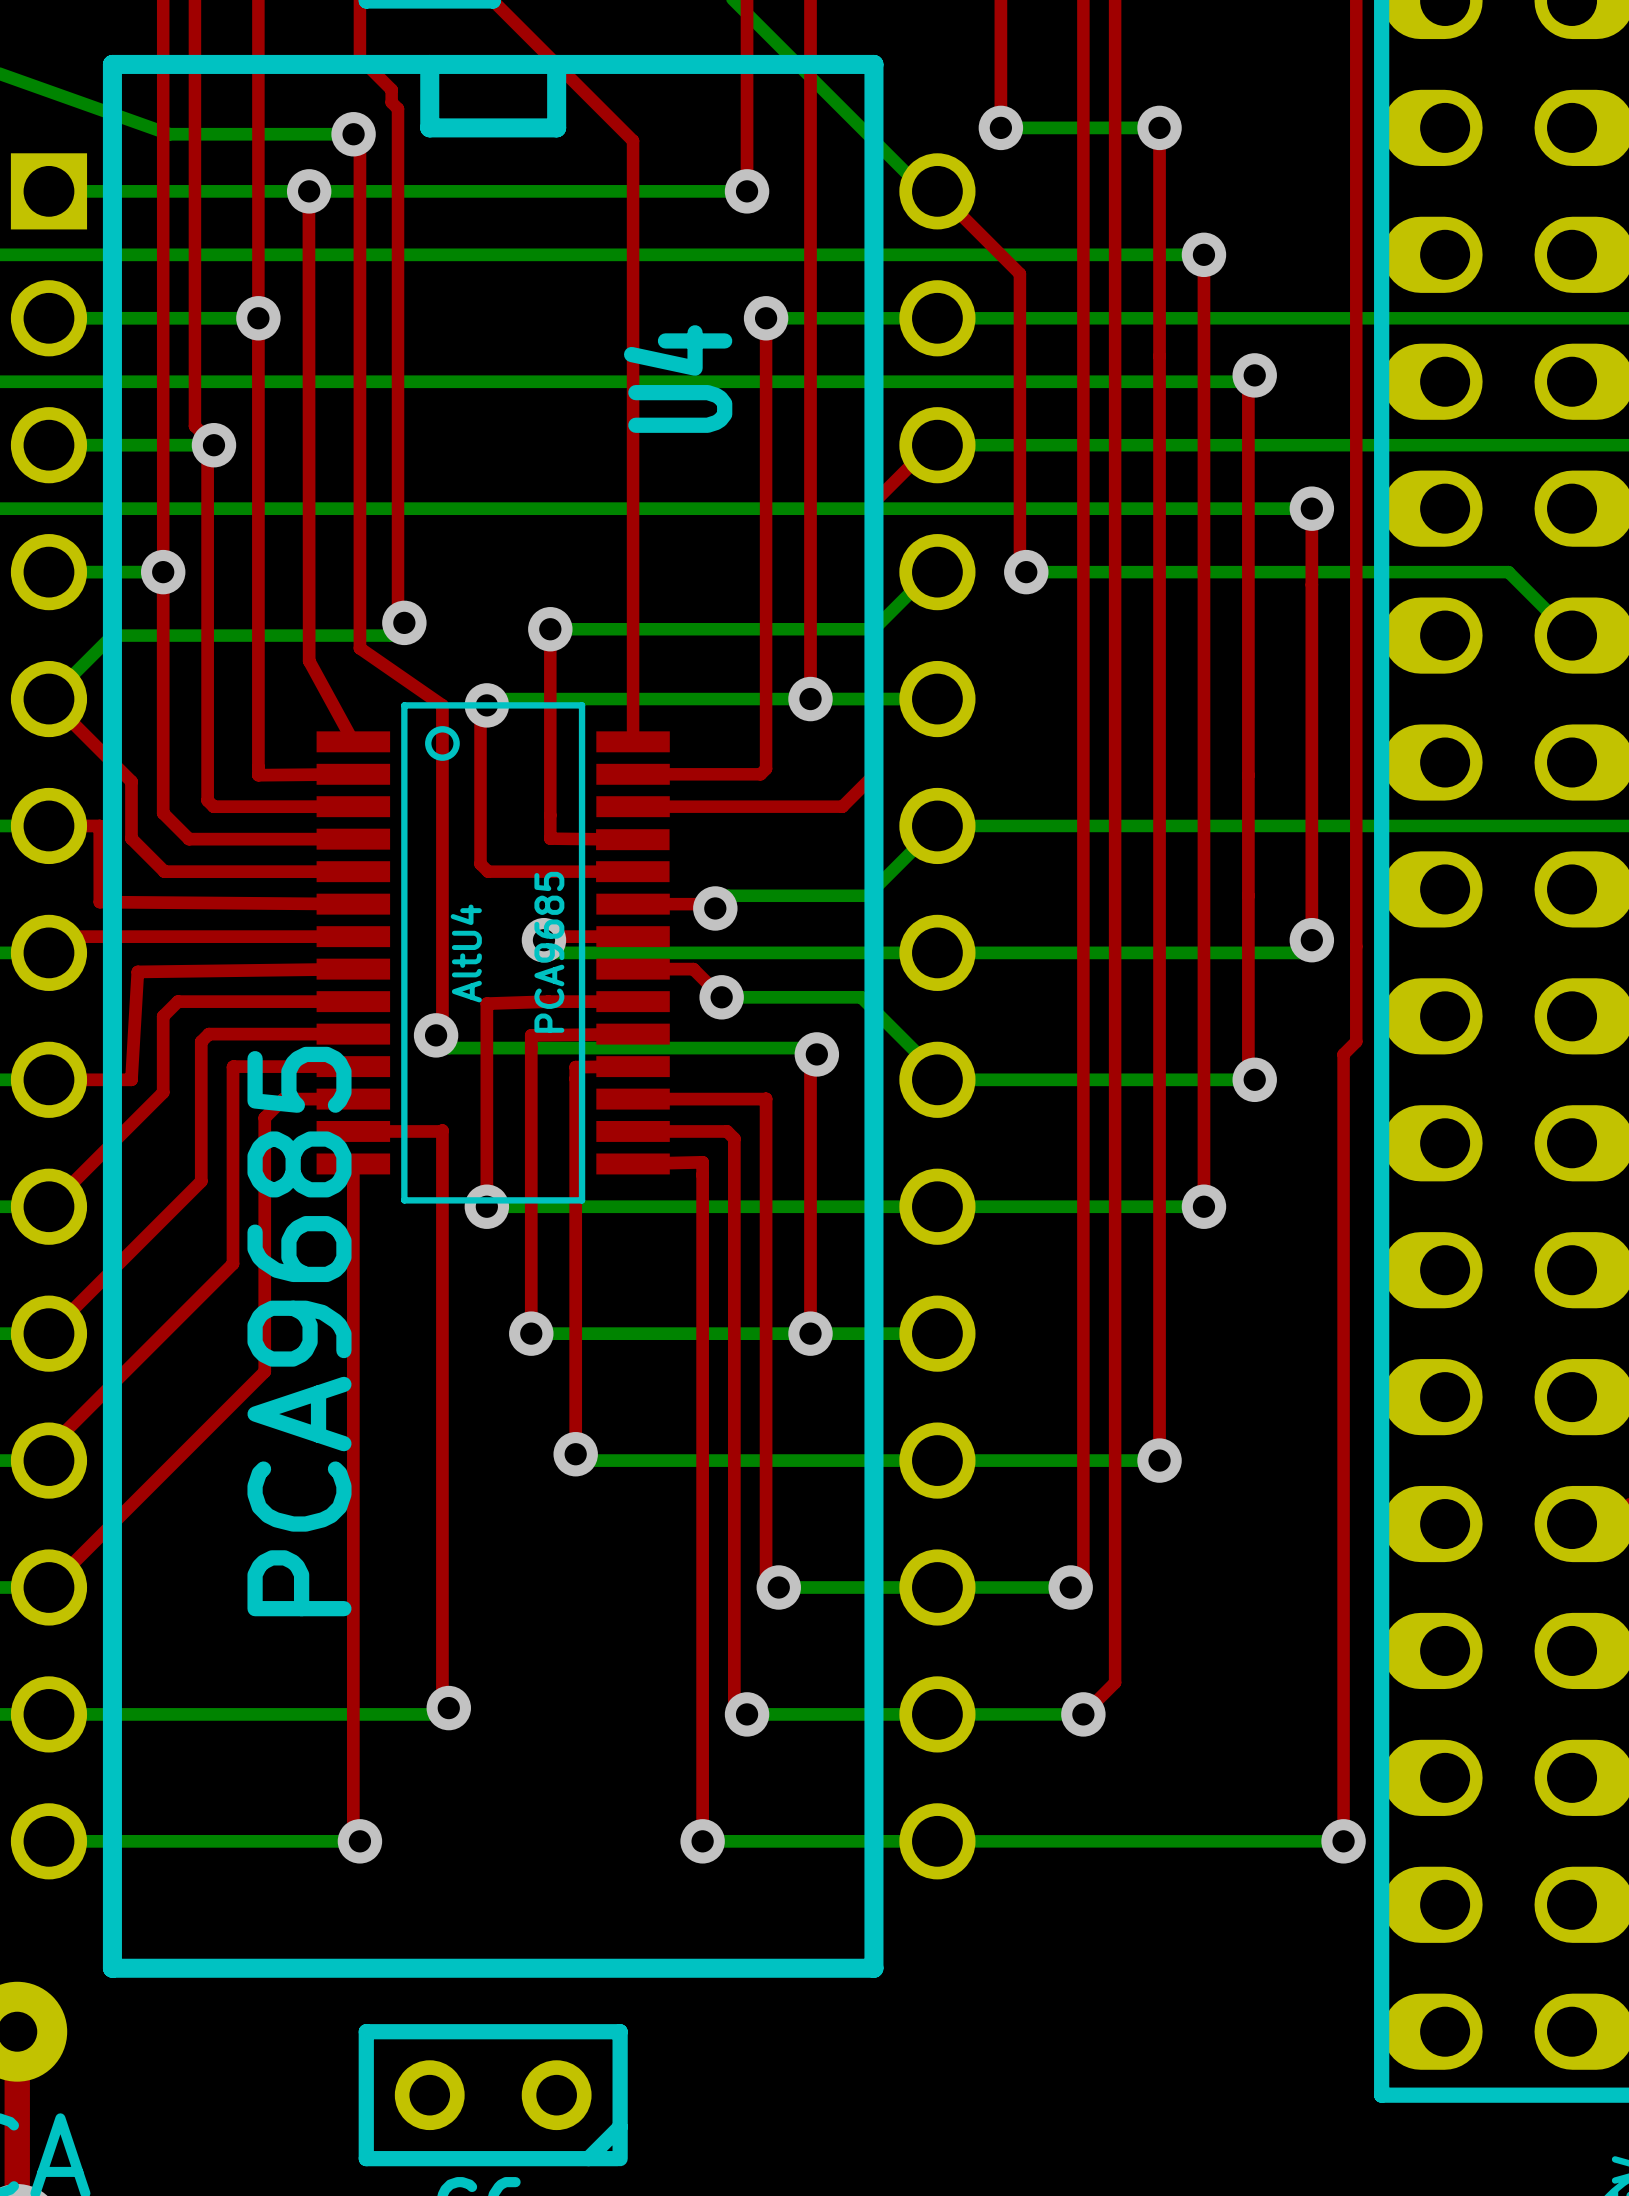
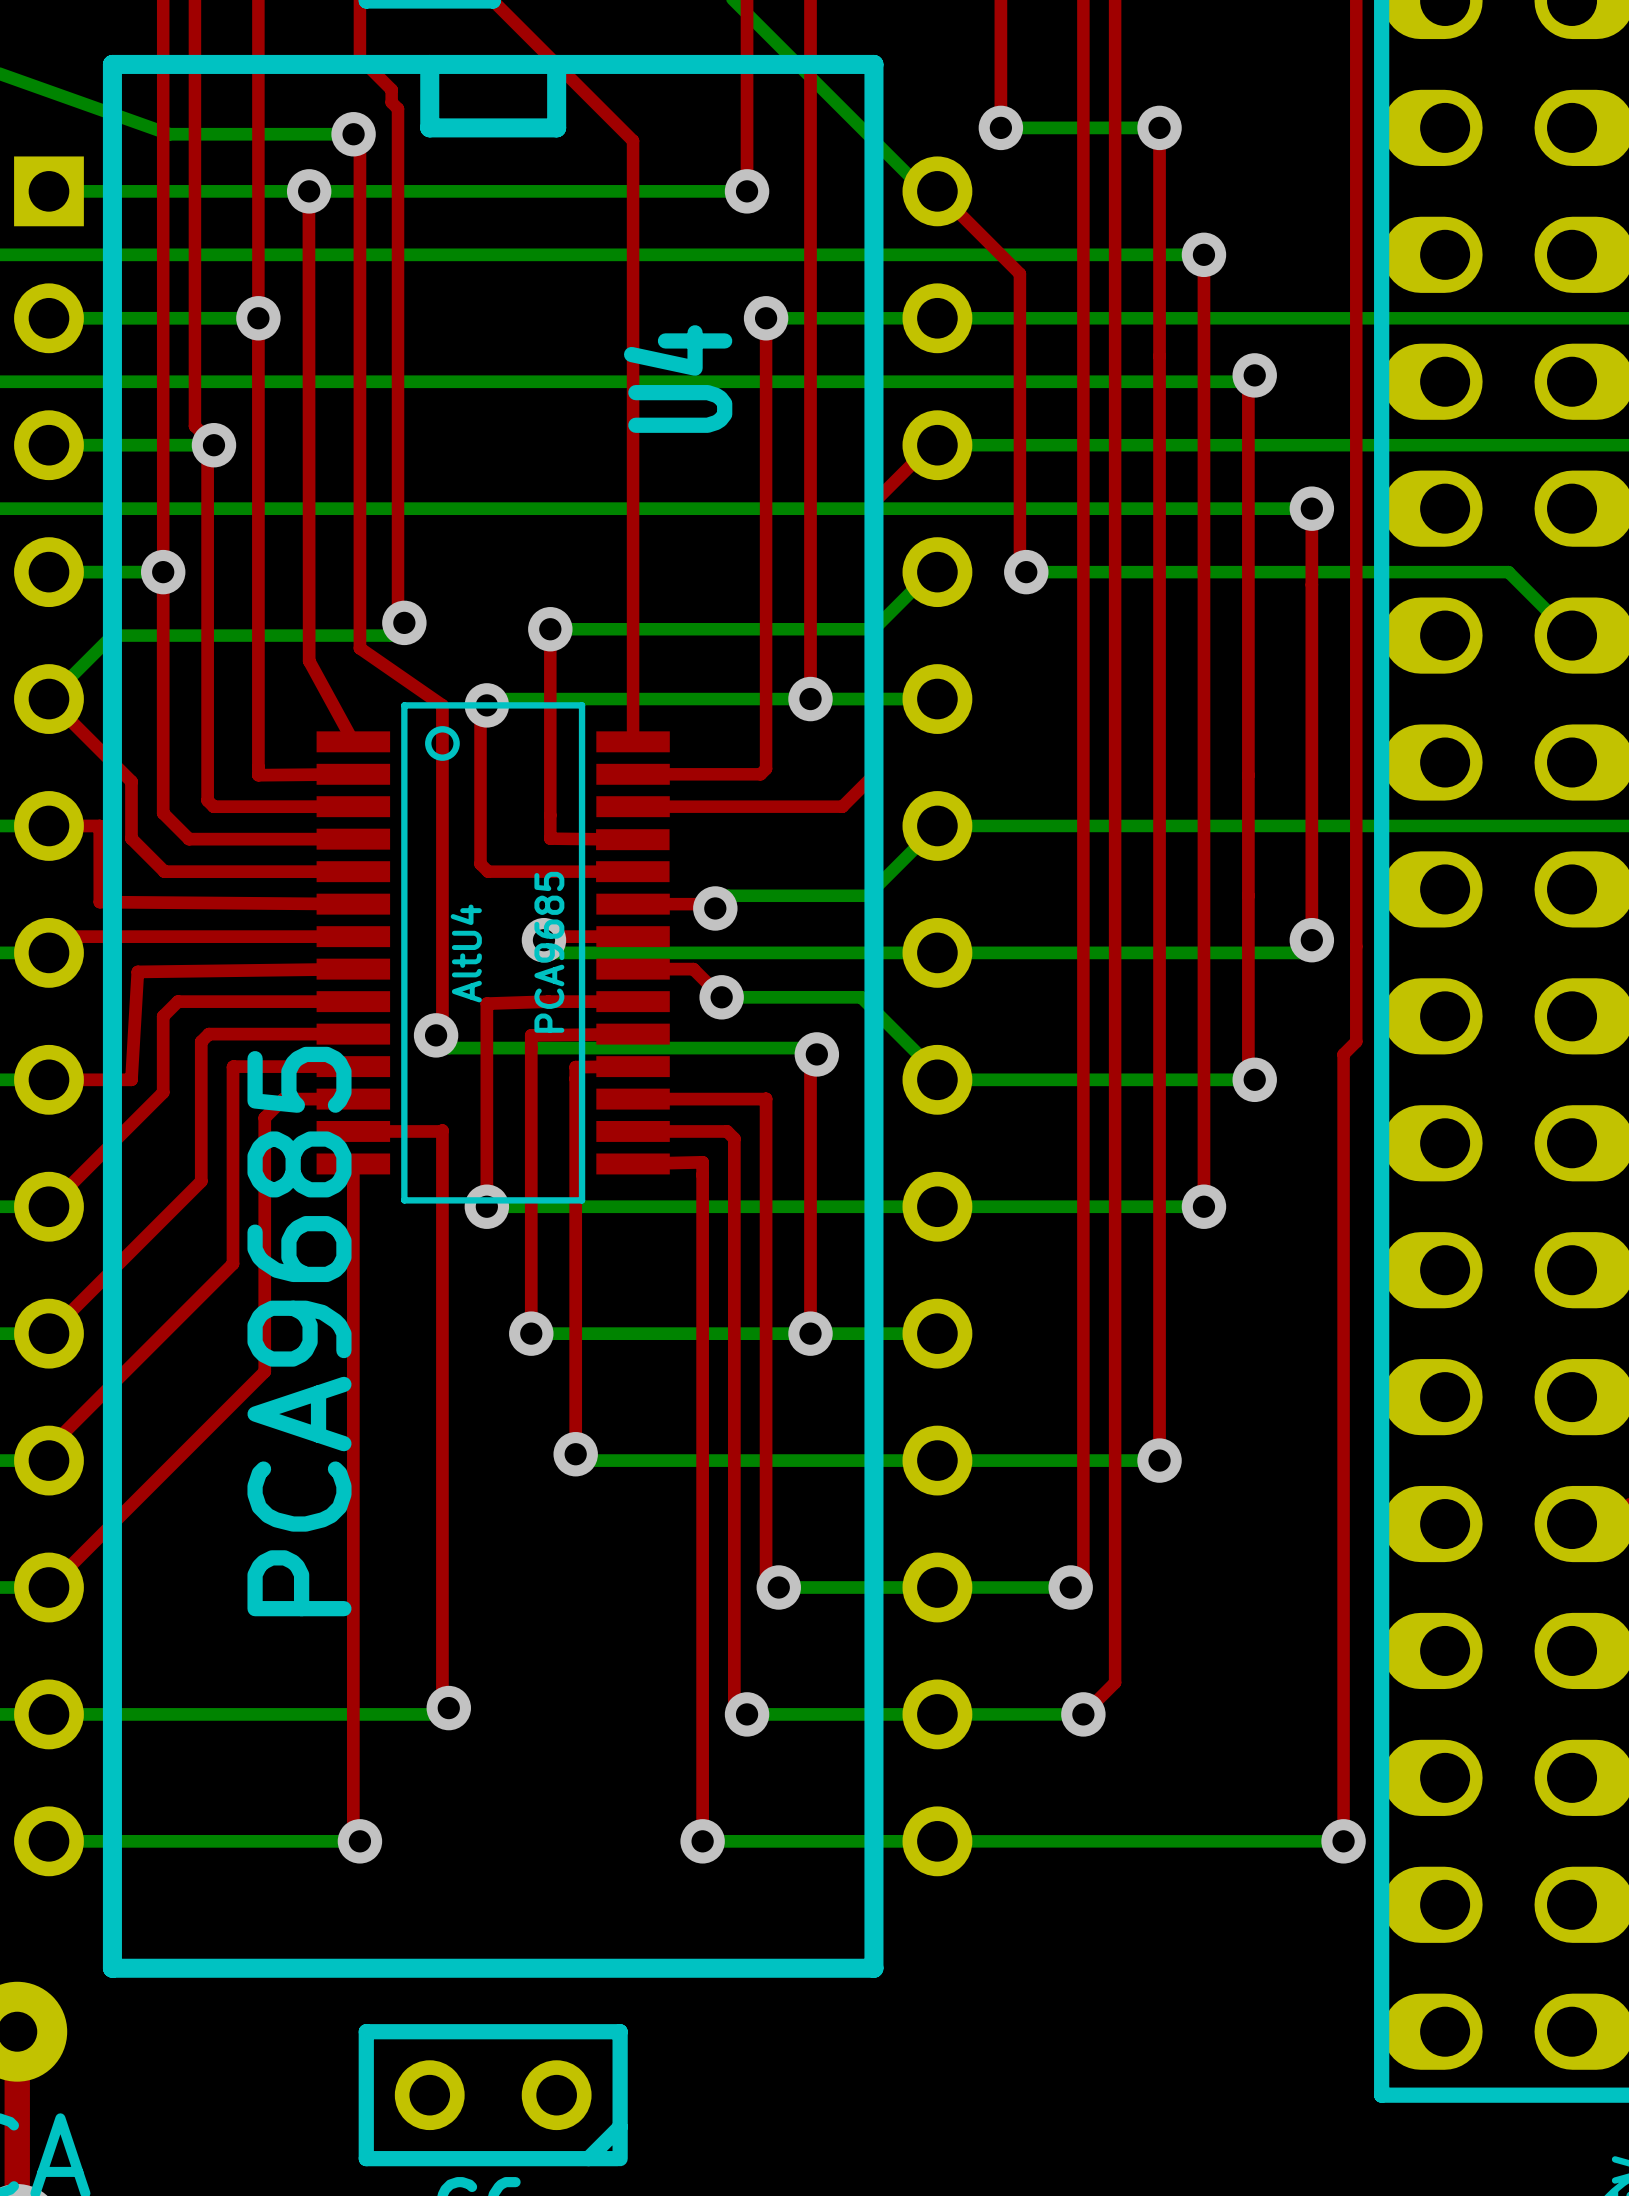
U4 footprint: [10, 54, 976, 1978] -> [14, 54, 973, 1978]

